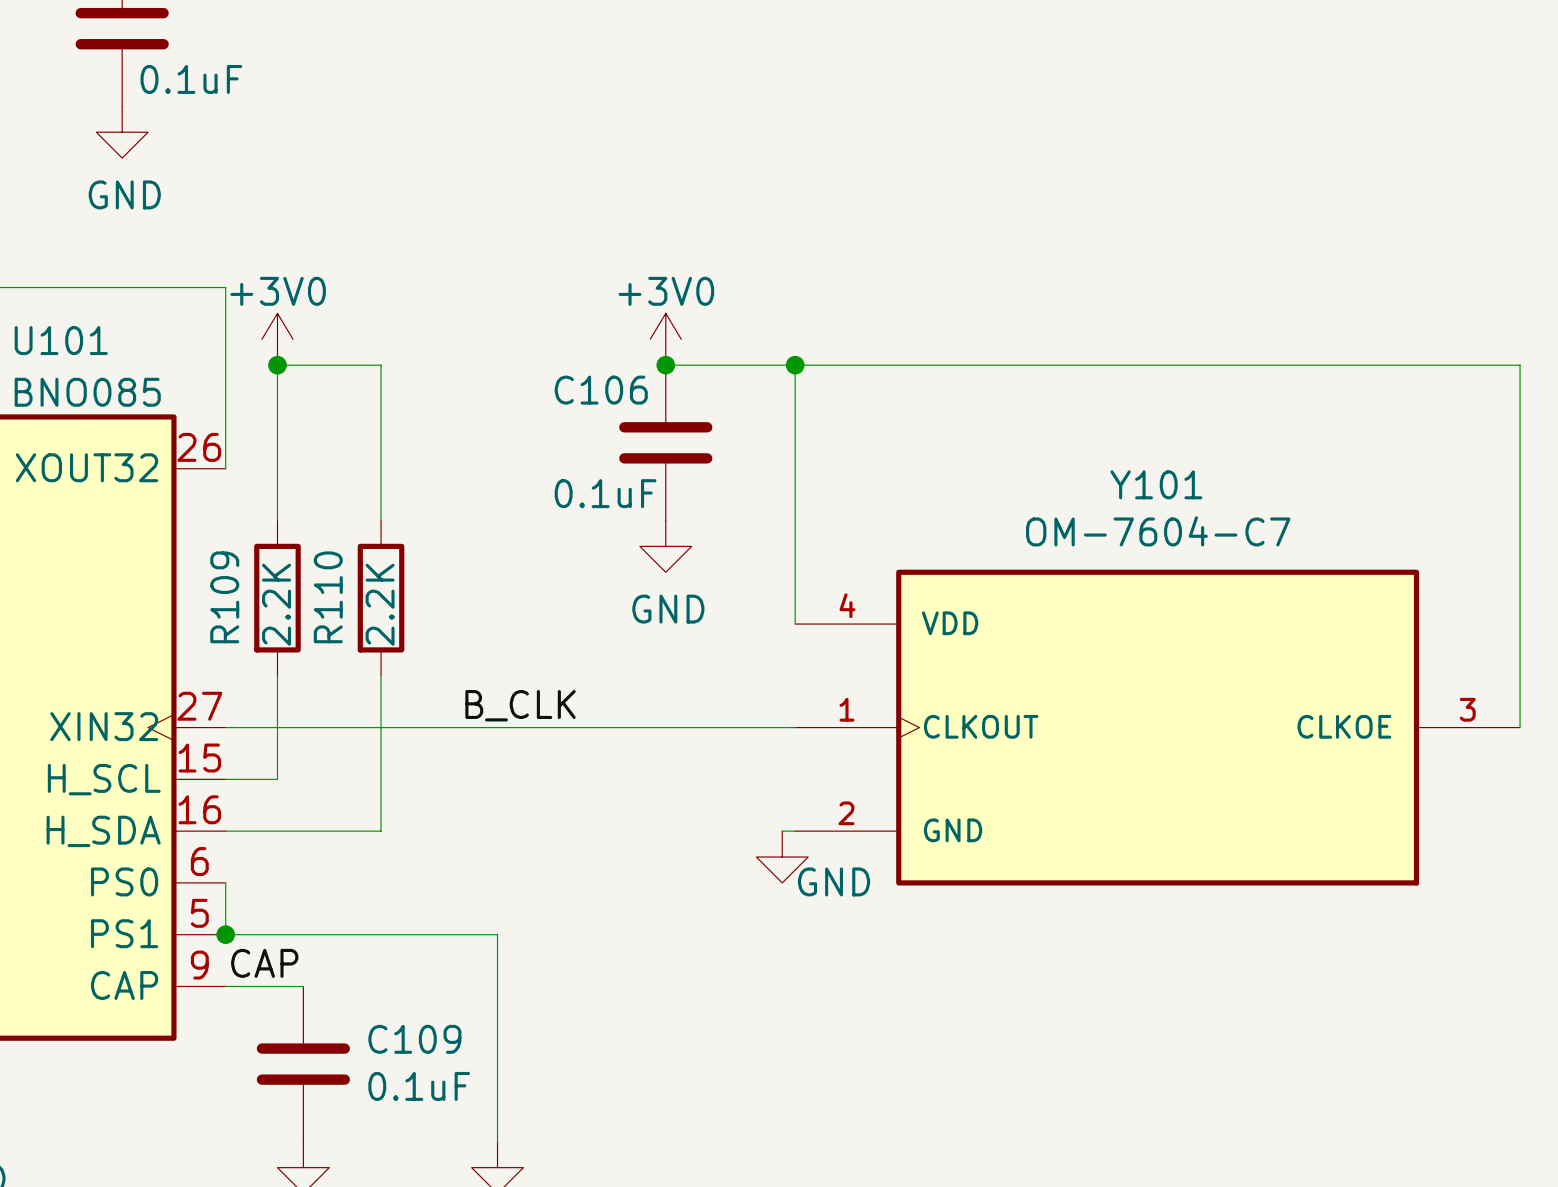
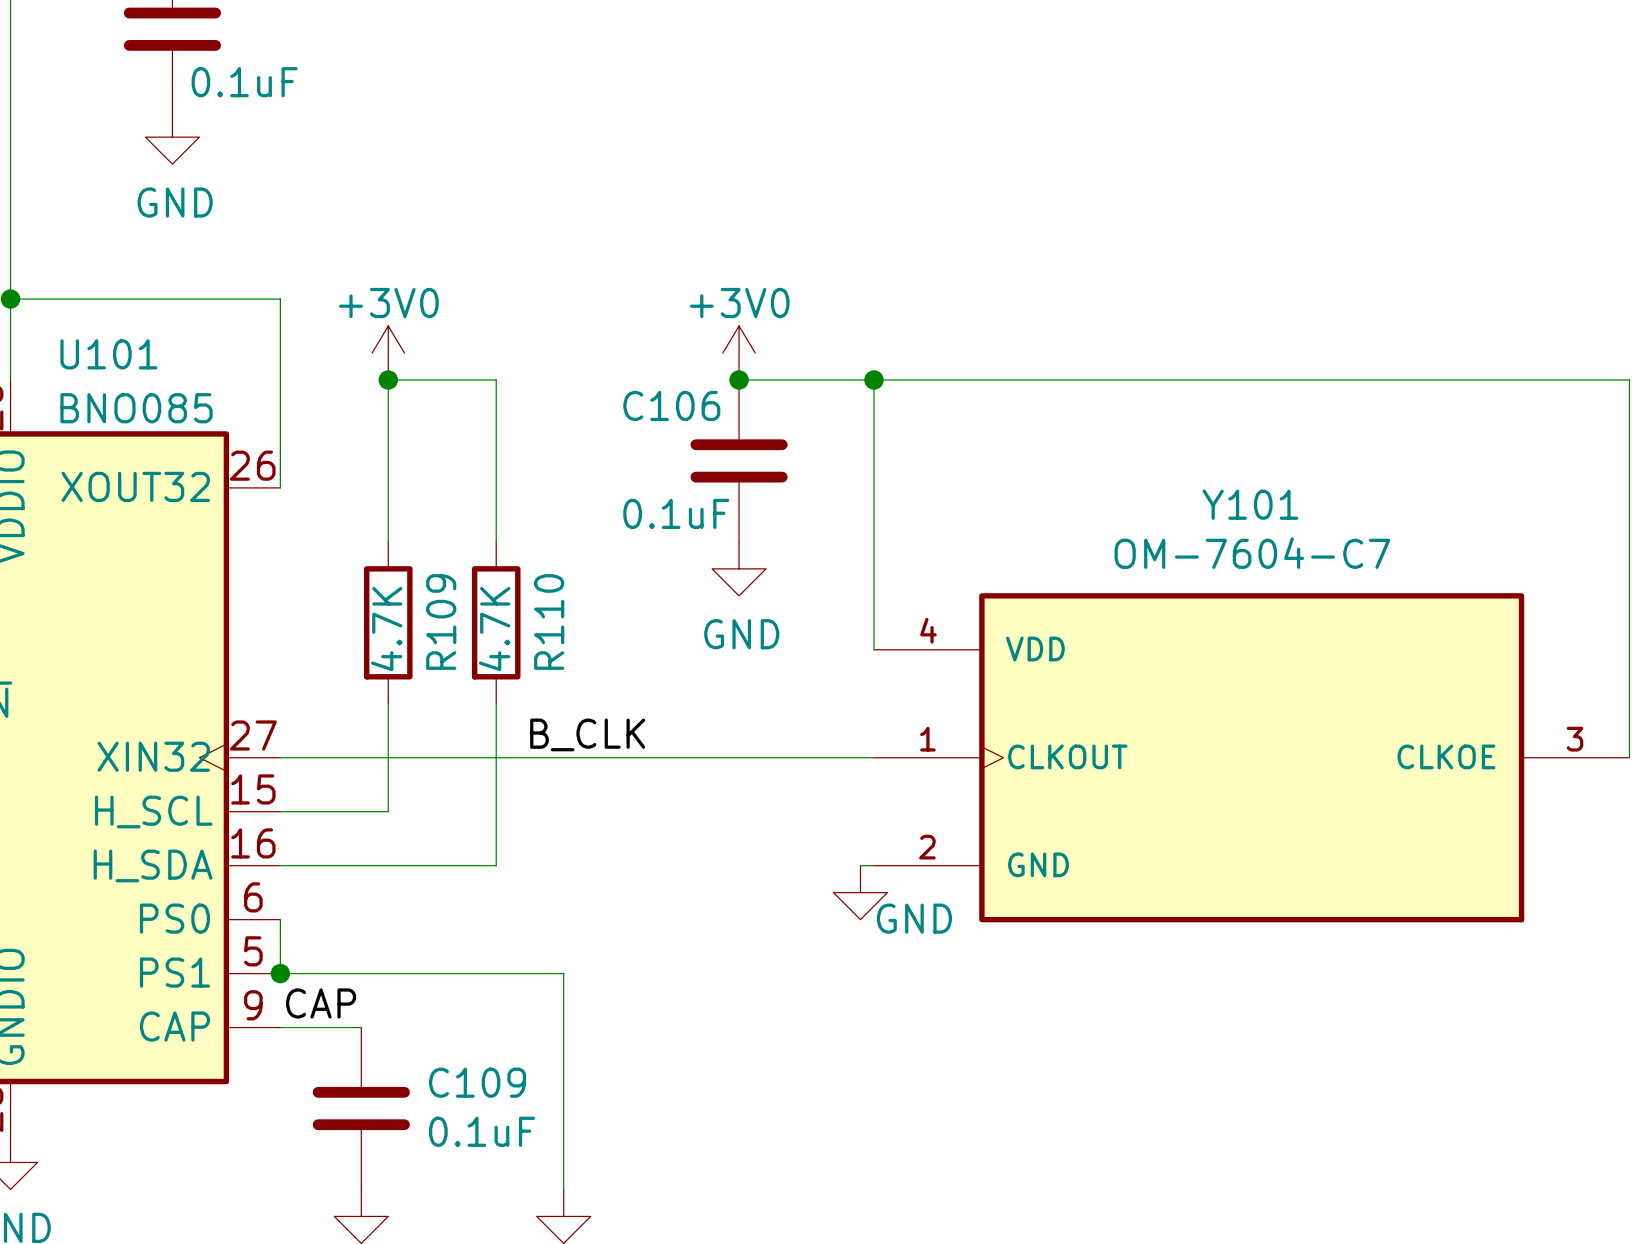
power symbol position: +3V0 (277, 339) -> +3V0 (388, 353)
junction position: (277, 365) -> (388, 379)
wire: (329, 365) (277, 365) (277, 520) -> (388, 379) (388, 541)
wire: (381, 365) (381, 520) -> (442, 379) (496, 379) (496, 541)
R109 name position: R109 (224, 597) -> R109 (441, 621)
R110 name position: R110 (328, 597) -> R110 (549, 621)
R109 position: (277, 598) -> (388, 622)
R110 position: (381, 598) -> (496, 622)
R109 value: 2.2K (276, 604) -> 4.7K (386, 629)
R110 value: 2.2K (380, 604) -> 4.7K (494, 629)
wire: (277, 675) (277, 779) -> (388, 703) (388, 811) (334, 811)
wire: (381, 675) (381, 831) -> (496, 703) (496, 865) (442, 865)

